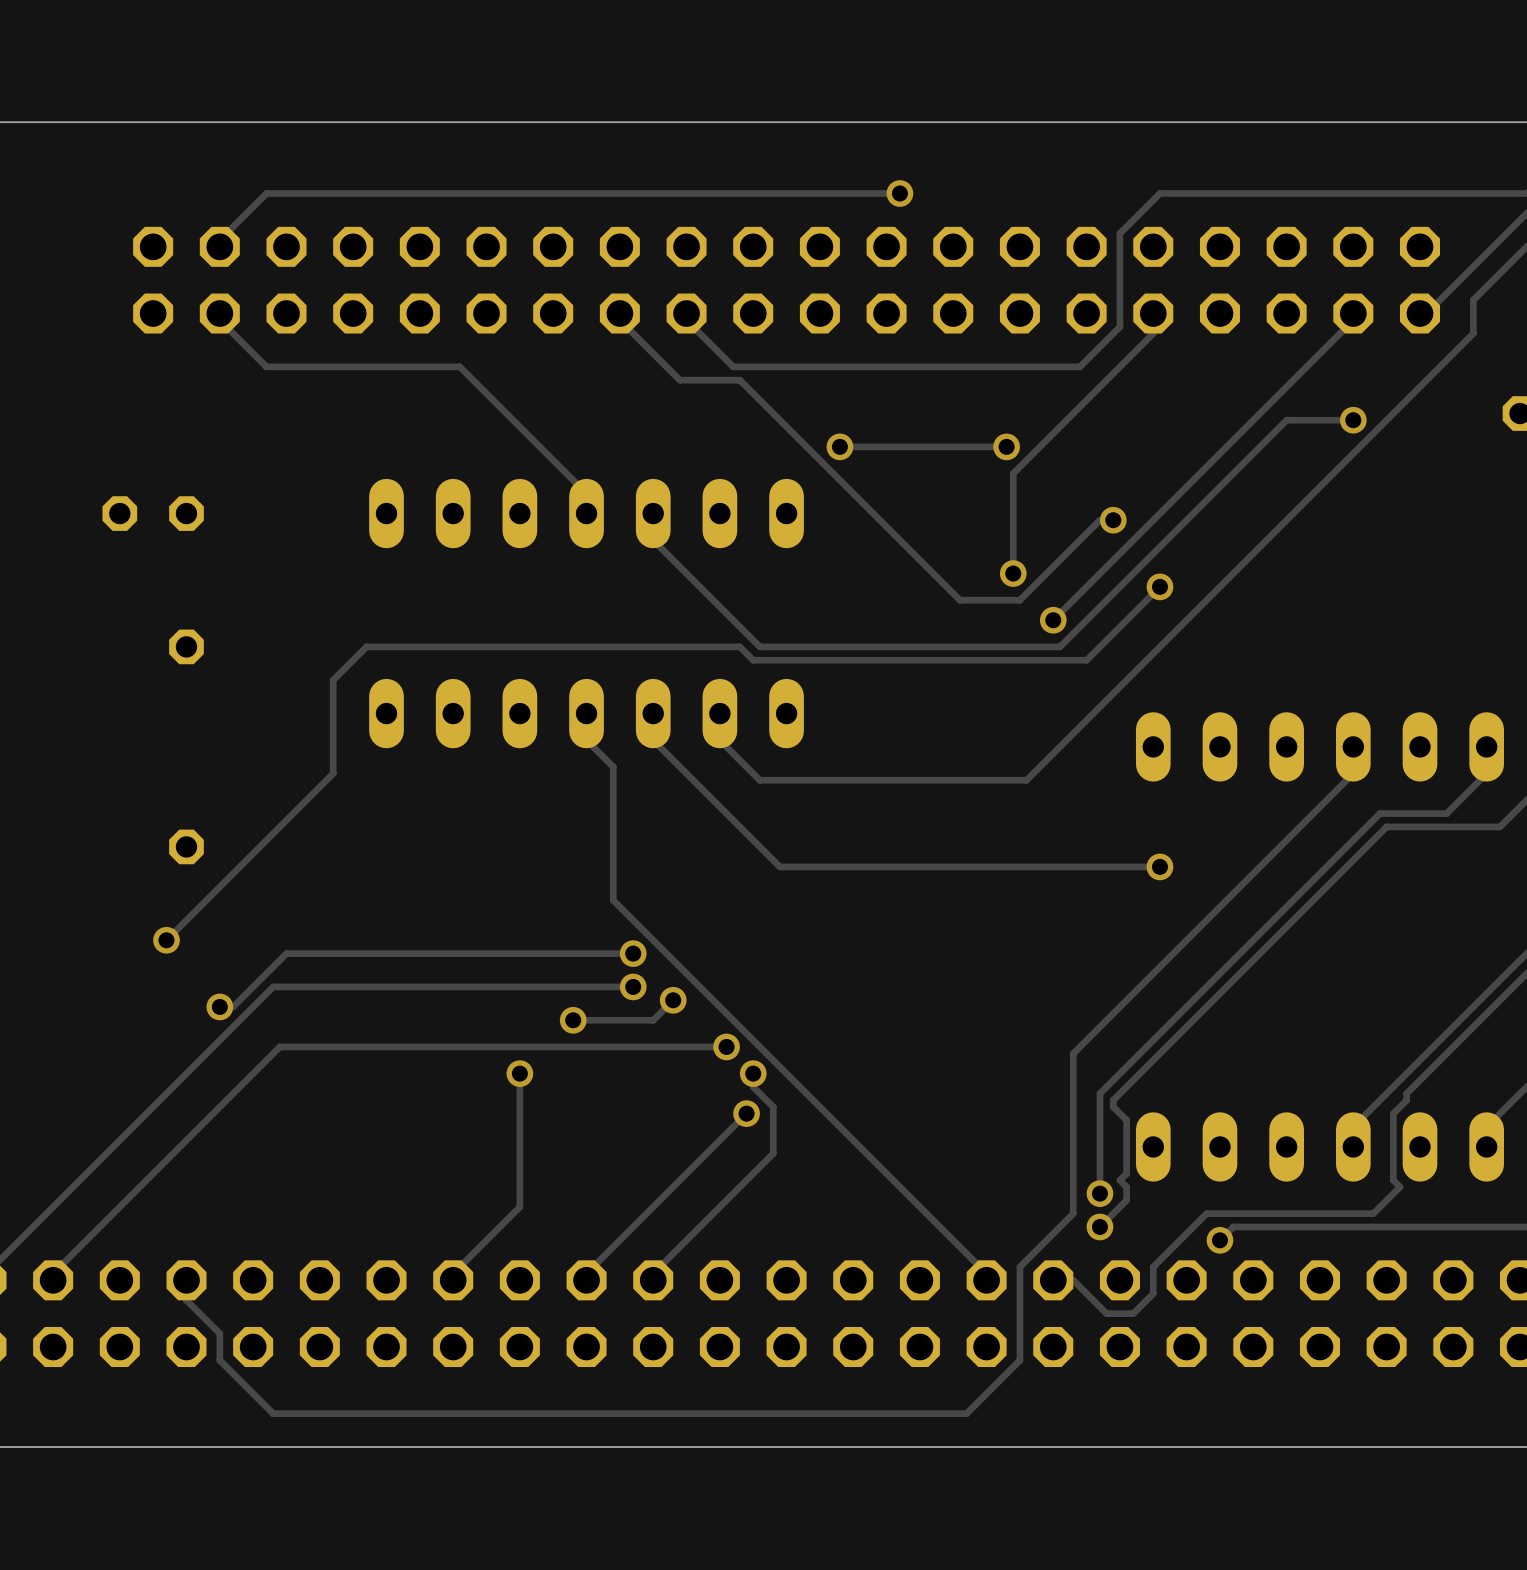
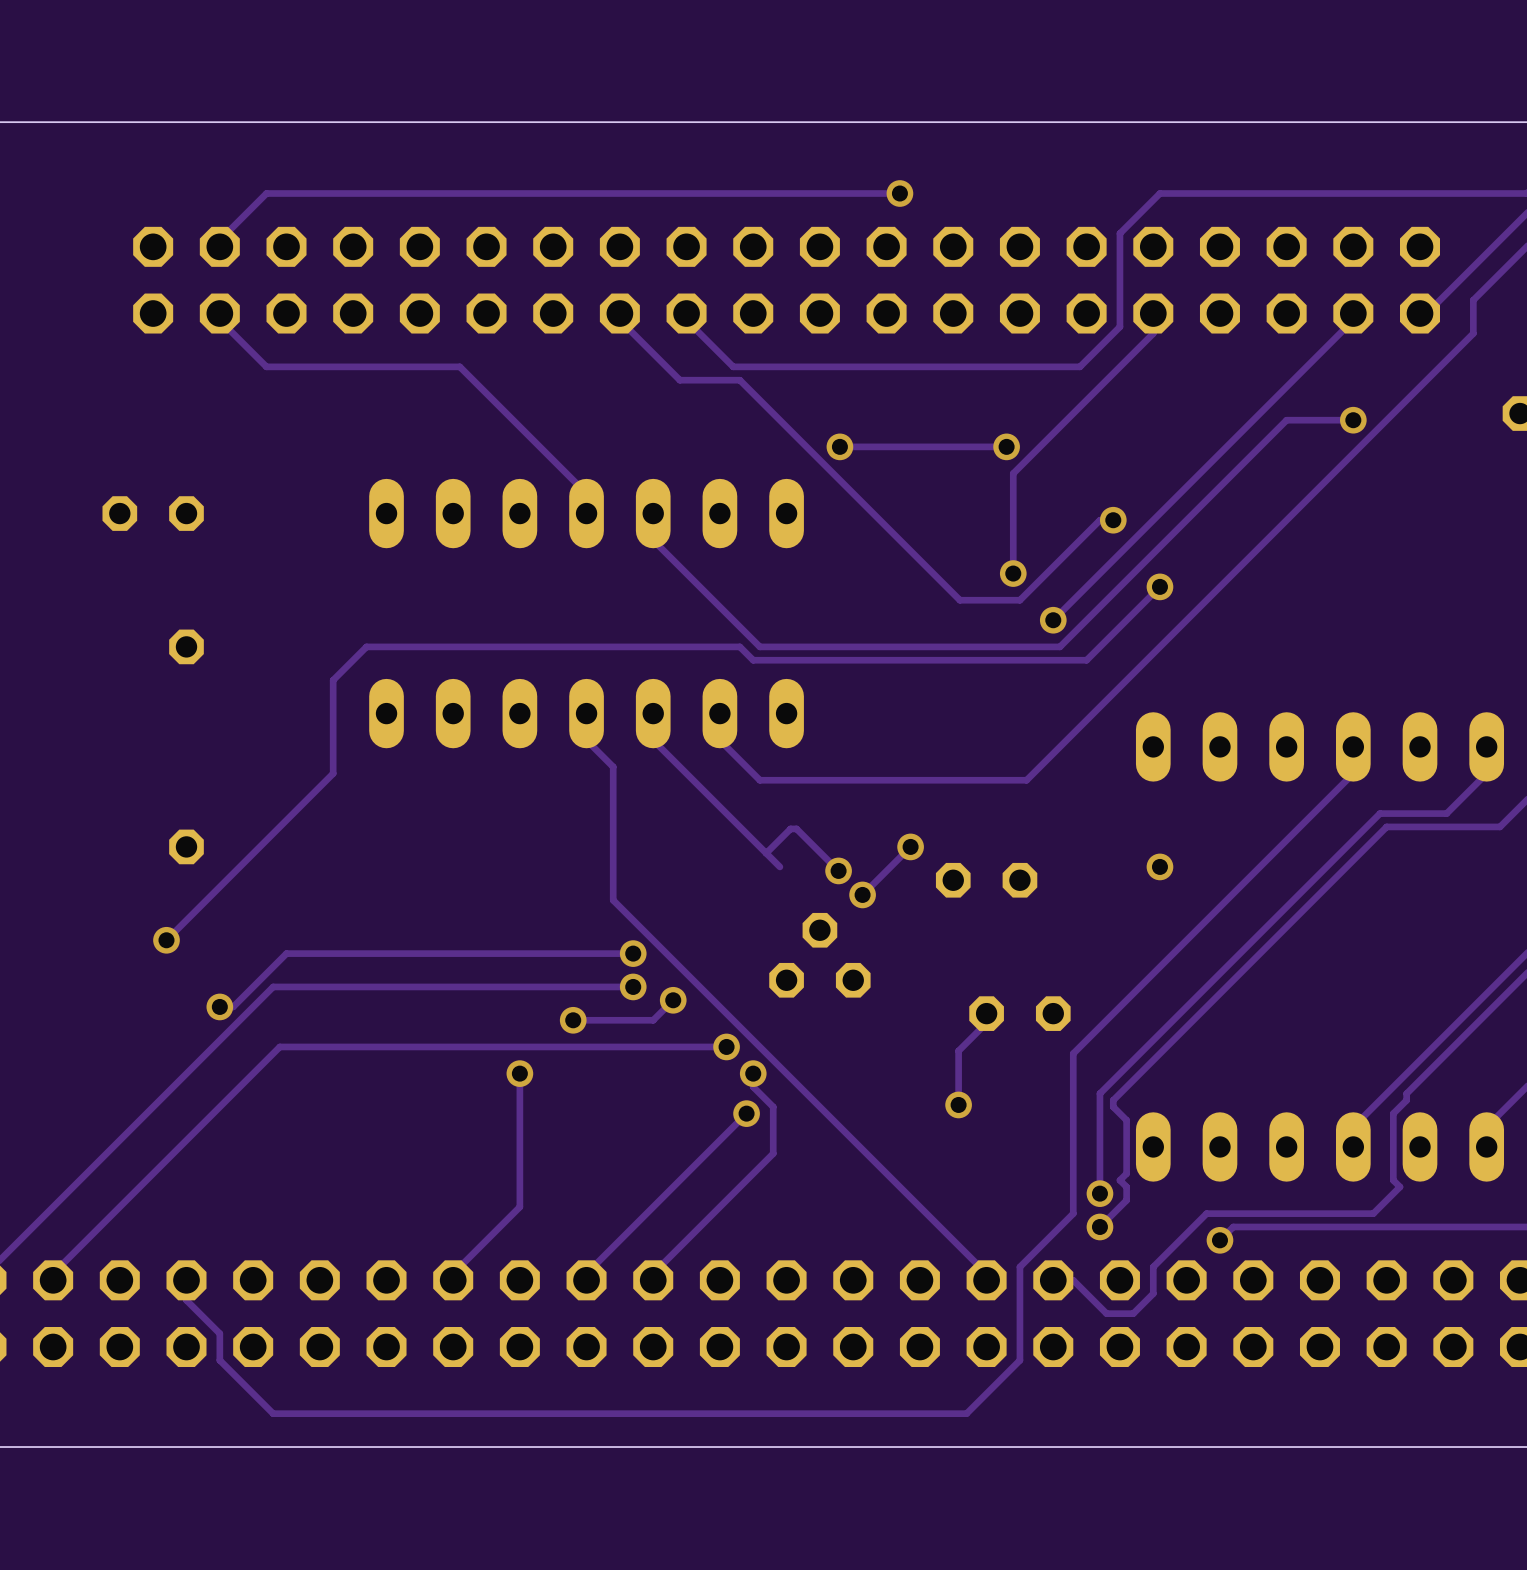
track: none -> (910, 846) (862, 894)
via: none -> (910, 846)
track: none -> (766, 853) (790, 828) (796, 828) (838, 870)
track: (1159, 866) (779, 866) -> none
via: none -> (838, 870)
part: none -> (986, 880)
via: none -> (862, 894)
part: none -> (819, 955)
track: none -> (986, 1013) (982, 1014) (982, 1026) (958, 1050) (958, 1104)
part: none -> (1019, 1013)
via: none -> (958, 1104)

